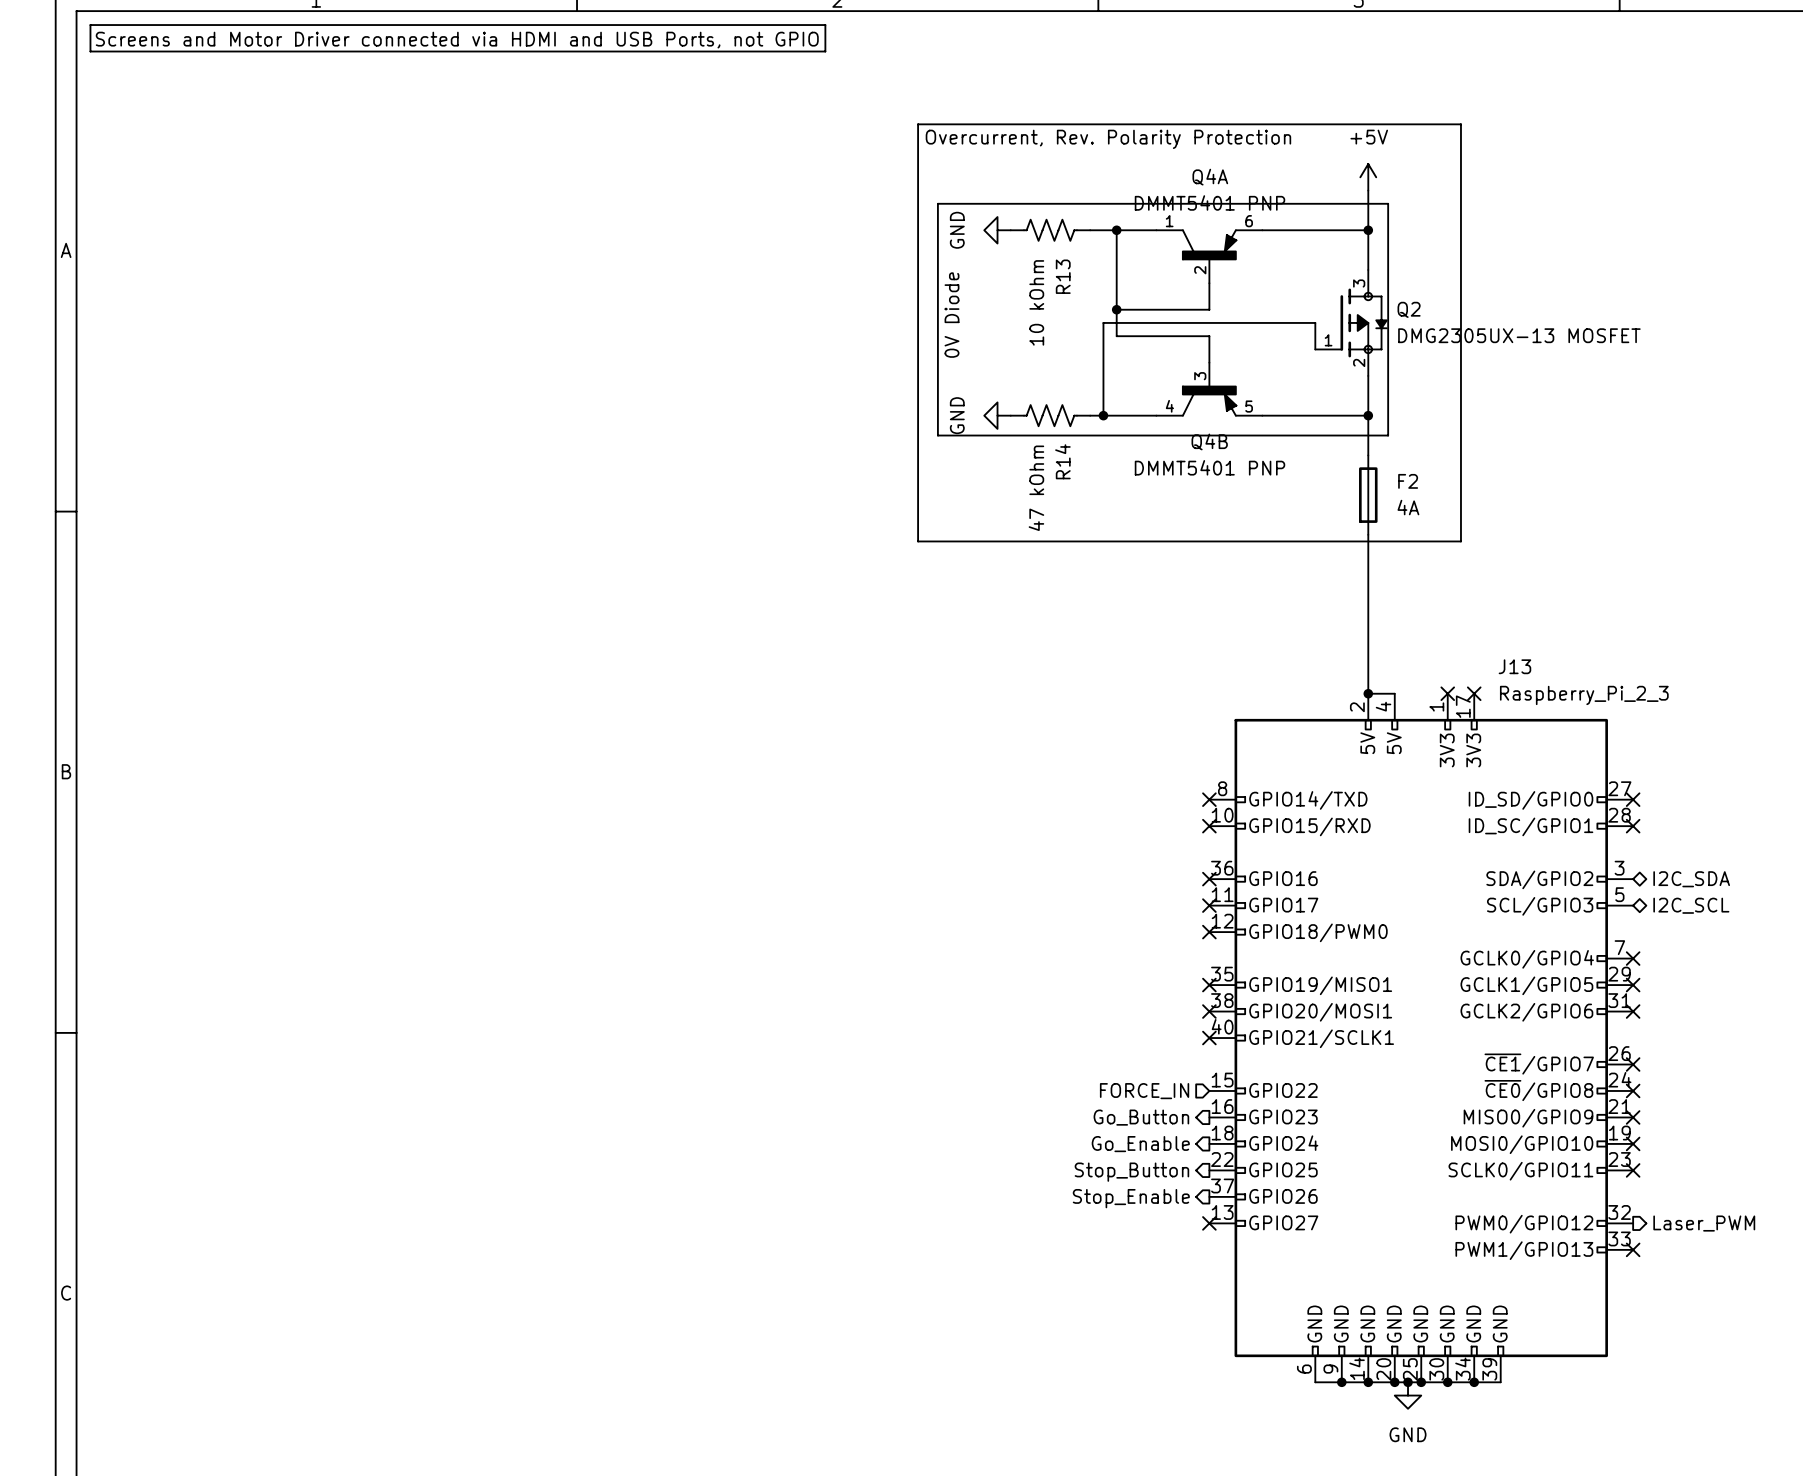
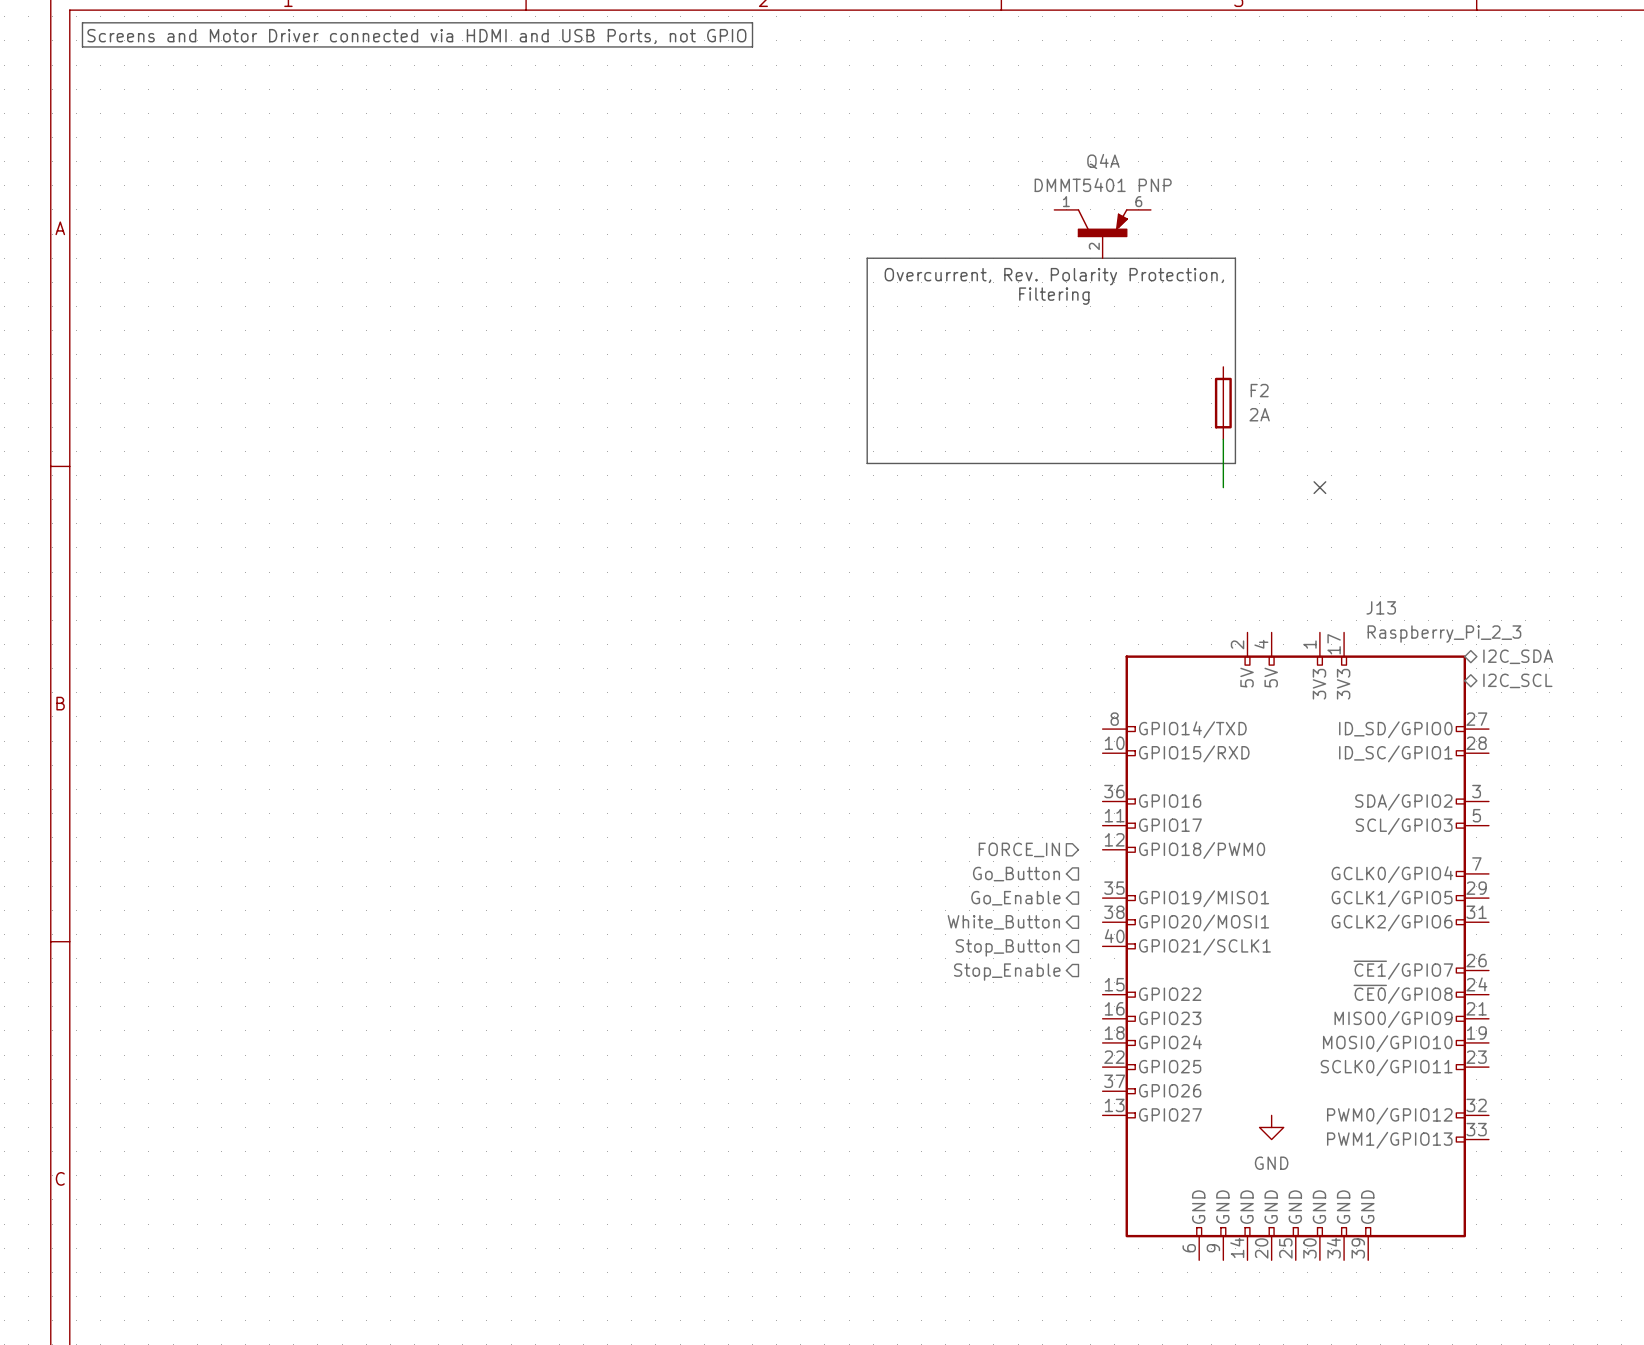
line: (918, 124) (1460, 124) (1460, 541) (918, 541) (918, 124) -> none
text: Overcurrent, Rev. Polarity Protection (1108, 139) -> none
power symbol: +5V (1368, 177) -> none
wire: (1368, 190) (1368, 270) -> none
line: (937, 203) (1388, 203) (1388, 435) (937, 435) (937, 203) -> none
power symbol: GND (997, 230) -> none
R13: 10 kOhm (1050, 230) -> none
wire: (1090, 230) (1156, 230) -> none
wire: (1116, 230) (1116, 336) (1209, 336) (1209, 362) -> none
junction: (1116, 230) -> none
wire: (1262, 230) (1368, 230) -> none
junction: (1368, 230) -> none
line: none -> (867, 258) (1235, 258) (1235, 463) (867, 463) (867, 258)
wire: (1209, 283) (1209, 309) (1116, 309) -> none
text: none -> Overcurrent, Rev. Polarity Protection, (1054, 276)
junction: (1116, 309) -> none
text: 0V Diode (952, 315) -> none
Q2: DMG2305UX-13 MOSFET (1351, 322) -> none
text: none -> Filtering (1054, 296)
wire: (1315, 349) (1315, 322) (1103, 322) (1103, 415) -> none
wire: (1368, 375) (1368, 455) -> none
Q4B: DMMT5401 PNP (1209, 389) -> none
power symbol: GND (997, 415) -> none
R14: 47 kOhm (1050, 415) -> none
wire: (1090, 415) (1156, 415) -> none
junction: (1103, 415) -> none
wire: (1262, 415) (1368, 415) -> none
junction: (1368, 415) -> none
wire: none -> (1223, 439) (1223, 487)
F2 position: (1368, 495) -> (1223, 403)
F2 value: 4A (1408, 507) -> 2A (1259, 414)
wire: (1368, 534) (1368, 693) (1394, 693) -> none
no-connect mark: none -> (1319, 487)
junction: (1368, 693) -> none
no-connect mark: (1447, 693) -> none
no-connect mark: (1474, 693) -> none
no-connect mark: (1209, 799) -> none
no-connect mark: (1633, 799) -> none
no-connect mark: (1209, 826) -> none
no-connect mark: (1633, 826) -> none
no-connect mark: (1209, 879) -> none
hierarchical label position: I2C_SDA (1691, 879) -> I2C_SDA (1518, 656)
no-connect mark: (1209, 905) -> none
hierarchical label position: I2C_SCL (1691, 905) -> I2C_SCL (1517, 680)
no-connect mark: (1209, 932) -> none
no-connect mark: (1633, 958) -> none
no-connect mark: (1209, 985) -> none
no-connect mark: (1633, 985) -> none
hierarchical label: none -> White_Button (1003, 922)
no-connect mark: (1209, 1011) -> none
no-connect mark: (1633, 1011) -> none
no-connect mark: (1209, 1038) -> none
no-connect mark: (1633, 1064) -> none
no-connect mark: (1633, 1090) -> none
hierarchical label position: FORCE_IN (1144, 1091) -> FORCE_IN (1019, 849)
hierarchical label position: Go_Button (1141, 1117) -> Go_Button (1016, 874)
no-connect mark: (1633, 1117) -> none
no-connect mark: (1633, 1143) -> none
hierarchical label position: Go_Enable (1140, 1144) -> Go_Enable (1015, 898)
no-connect mark: (1633, 1170) -> none
hierarchical label position: Stop_Button (1131, 1172) -> Stop_Button (1007, 947)
hierarchical label position: Stop_Enable (1131, 1198) -> Stop_Enable (1007, 972)
no-connect mark: (1209, 1223) -> none
hierarchical label: Laser_PWM (1704, 1223) -> none
no-connect mark: (1633, 1249) -> none
wire: (1315, 1382) (1500, 1382) -> none
junction: (1341, 1382) -> none
junction: (1368, 1382) -> none
junction: (1394, 1382) -> none
junction: (1408, 1382) -> none
junction: (1421, 1382) -> none
junction: (1447, 1382) -> none
junction: (1474, 1382) -> none
power symbol position: GND (1408, 1395) -> GND (1271, 1127)

